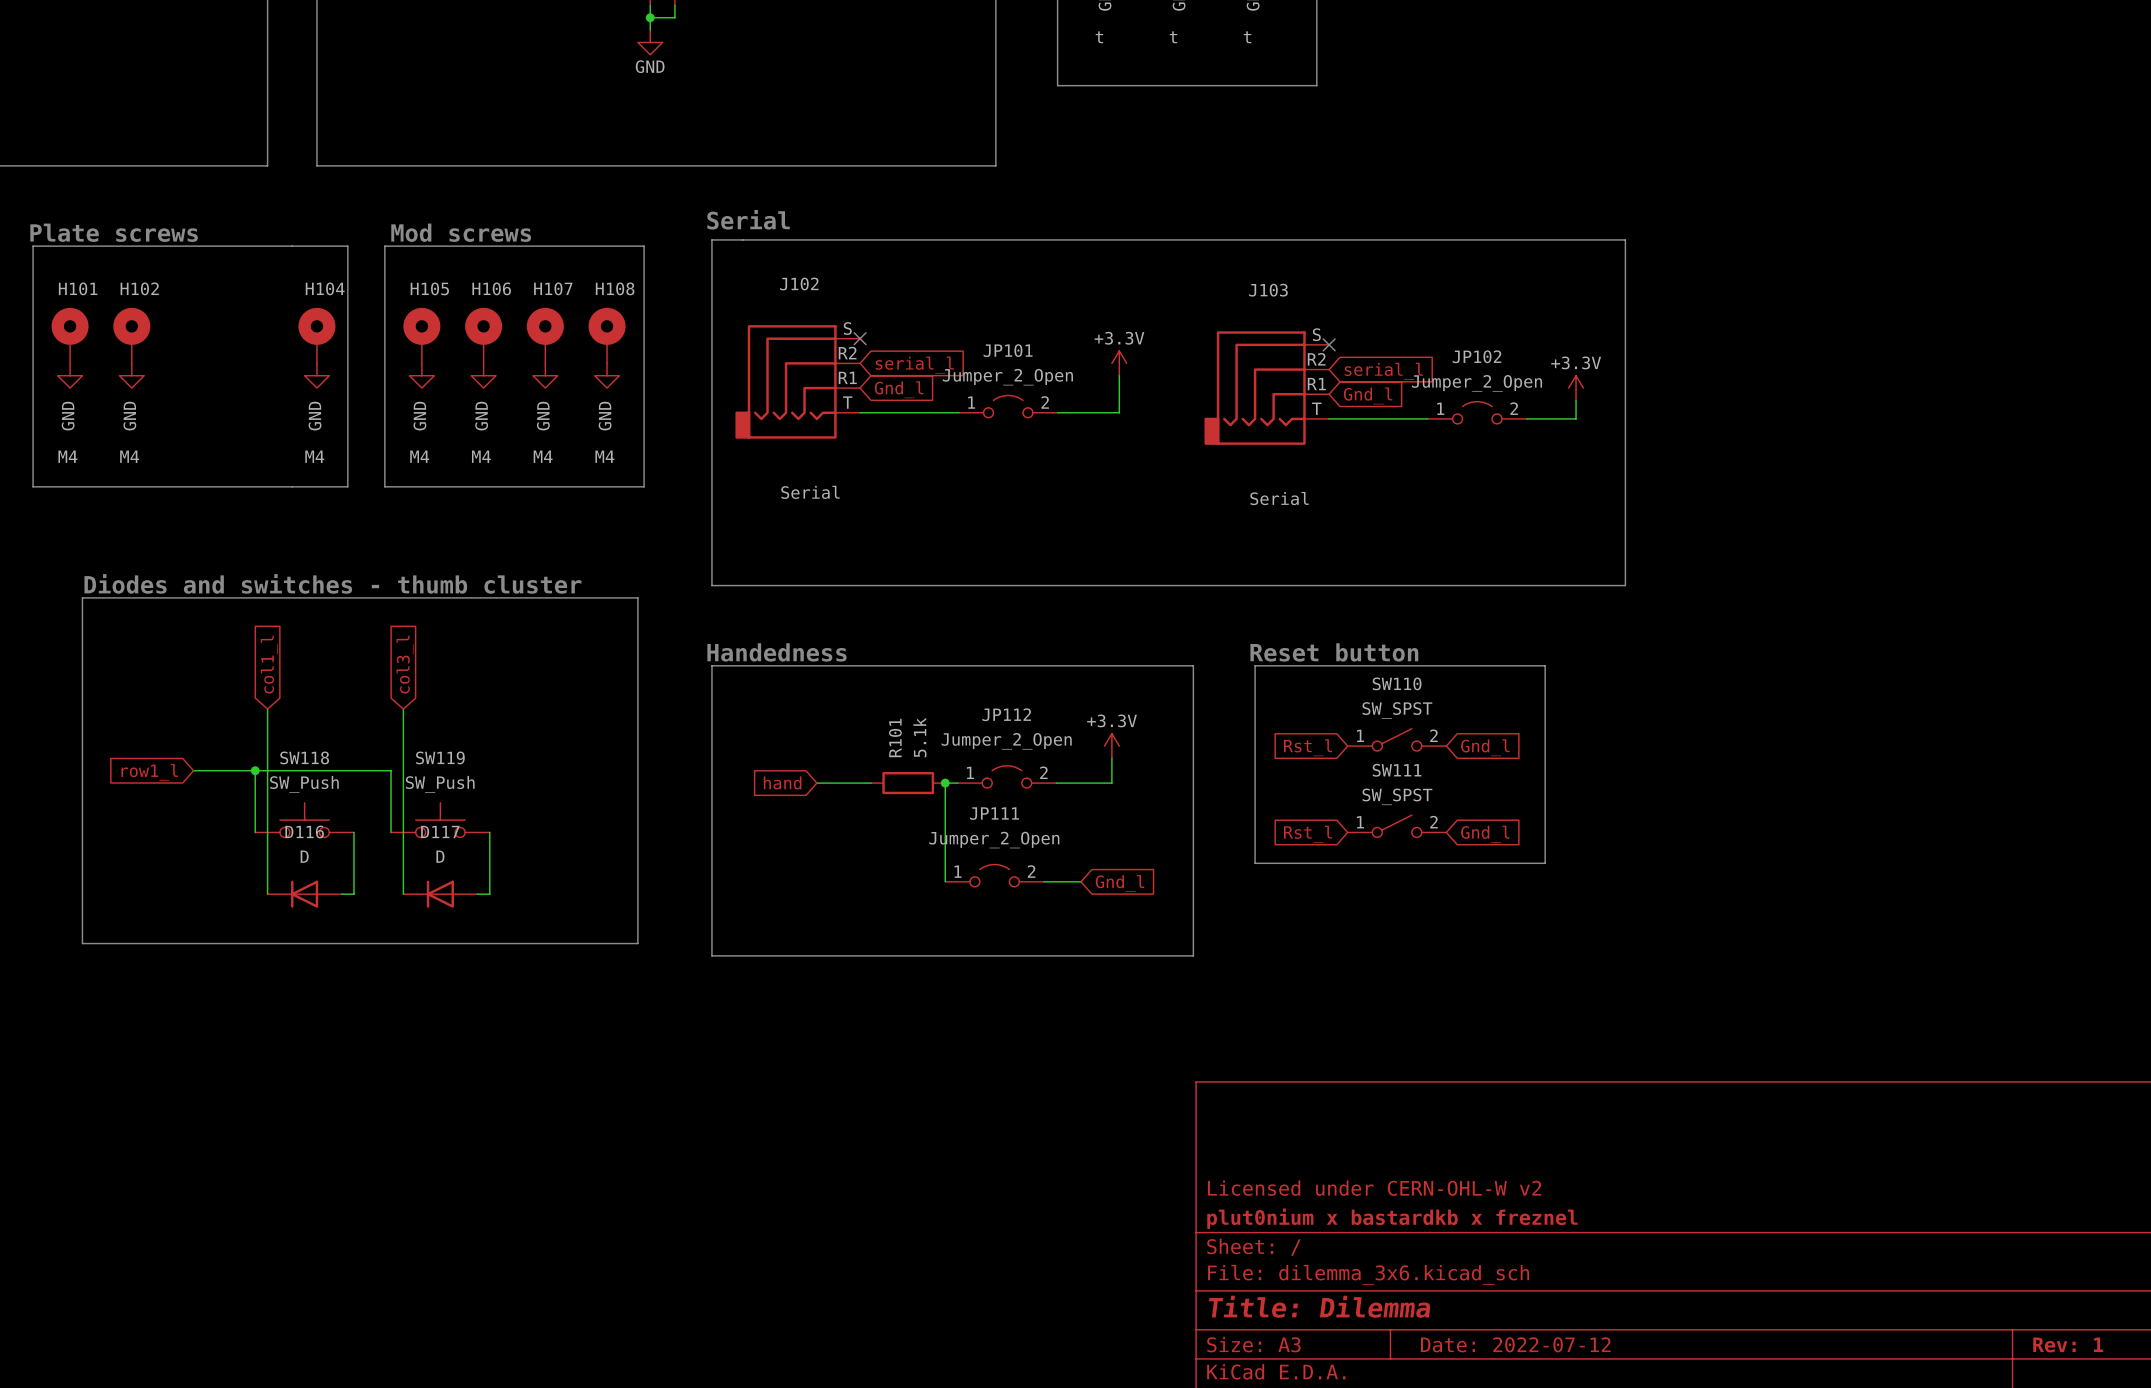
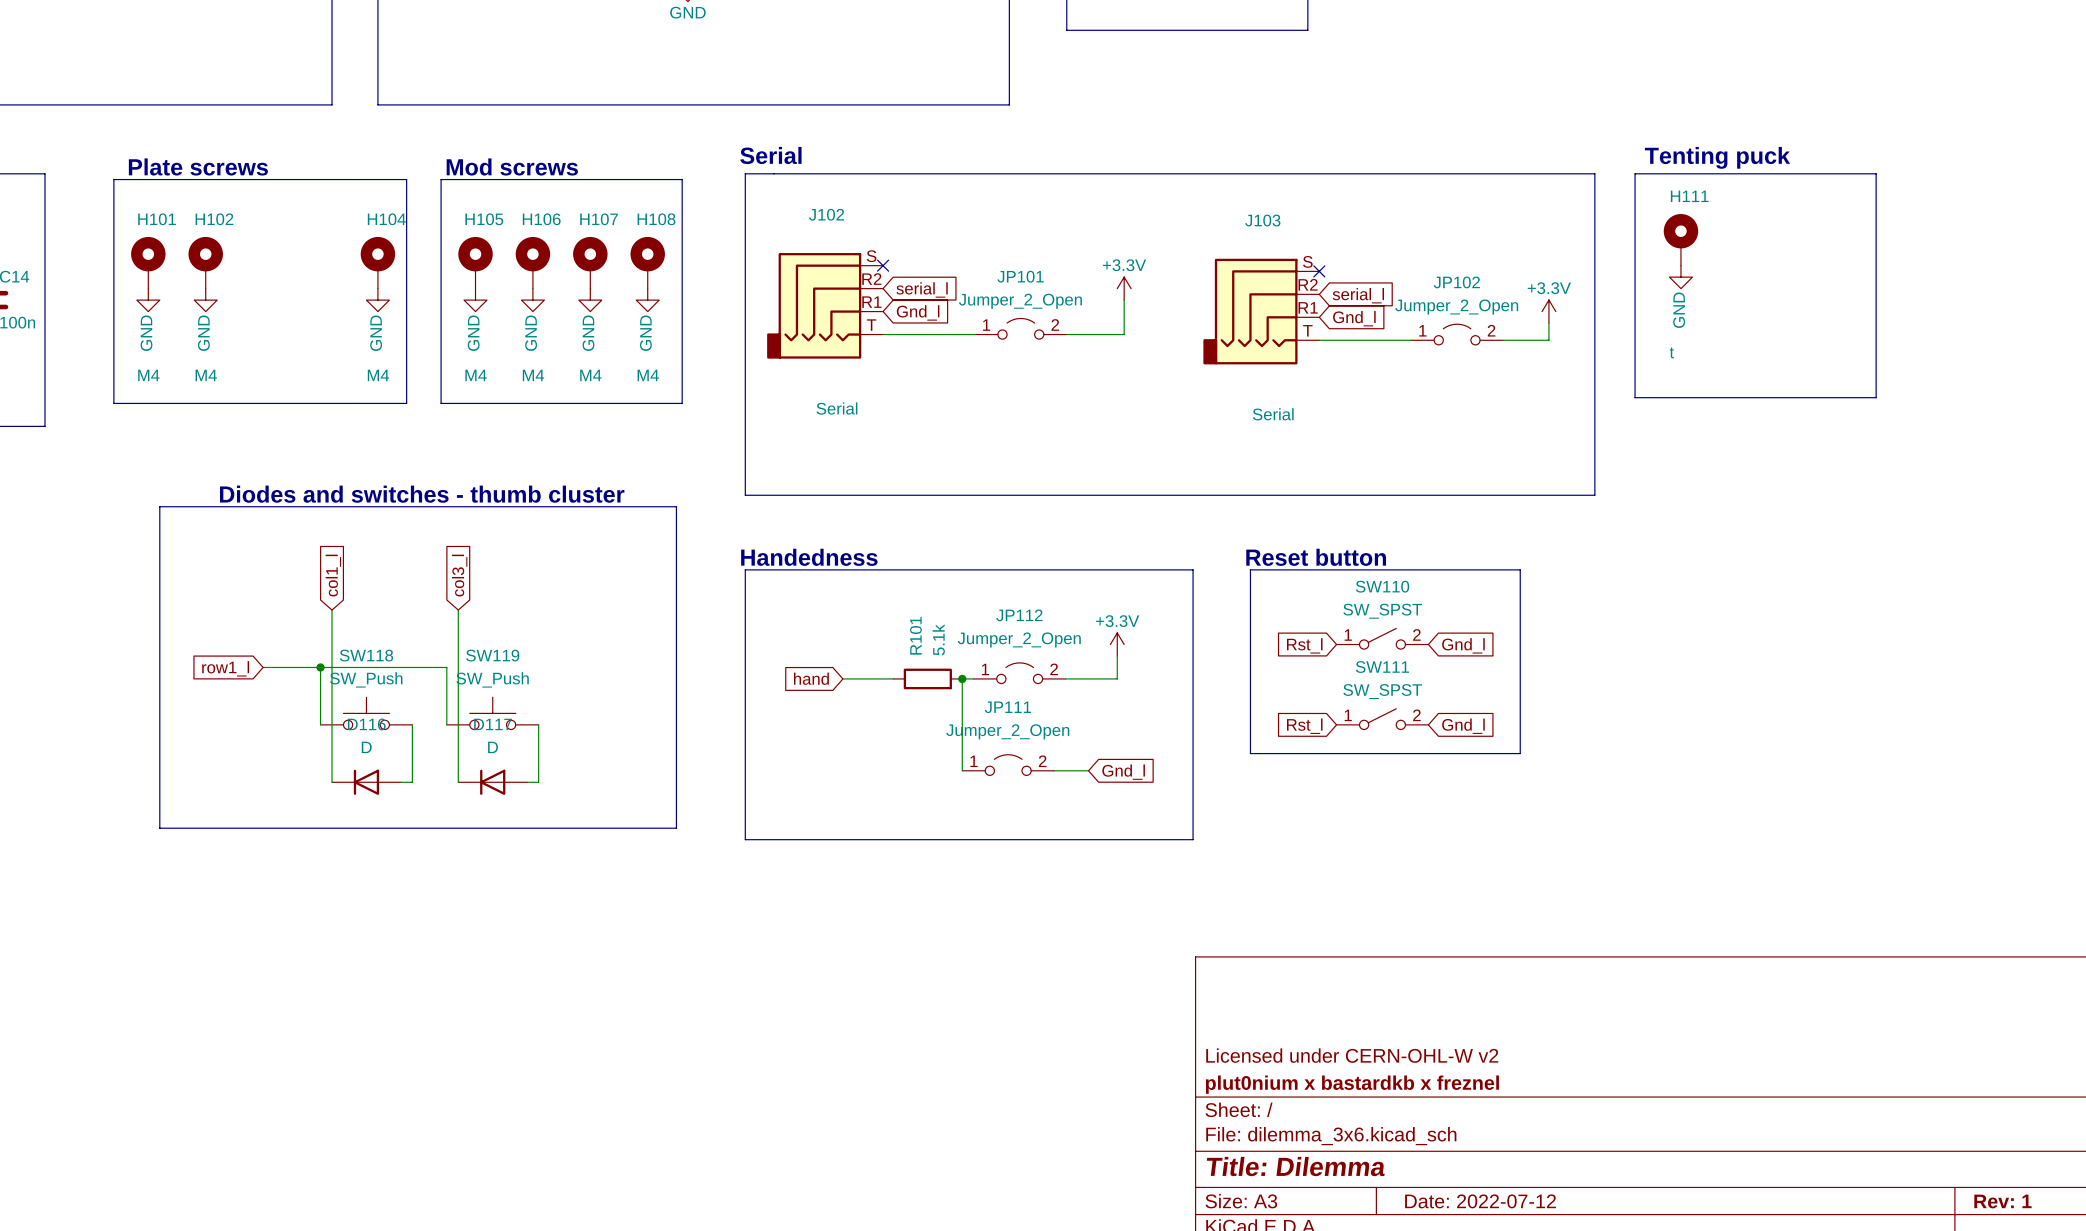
text: none -> Tenting puck (1717, 157)
line: none -> (1635, 173) (1635, 397) (1876, 397) (1876, 173) (1635, 173)
H111: none -> t (1680, 239)
power symbol: none -> GND (1680, 277)

